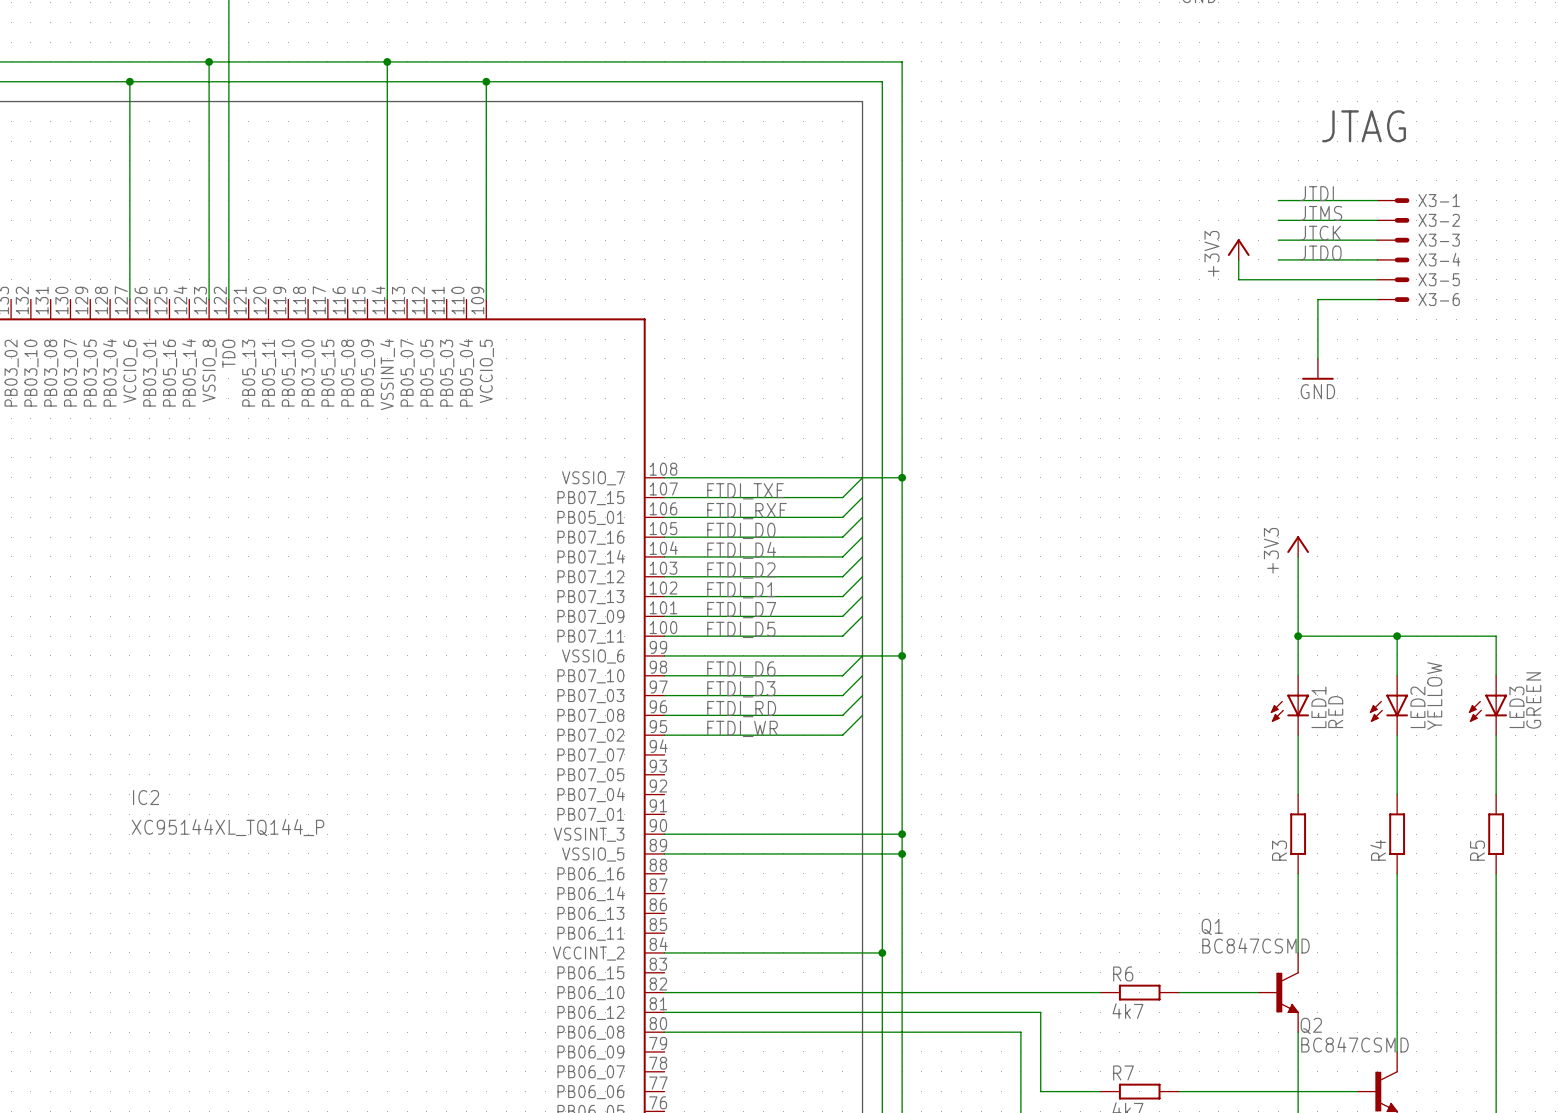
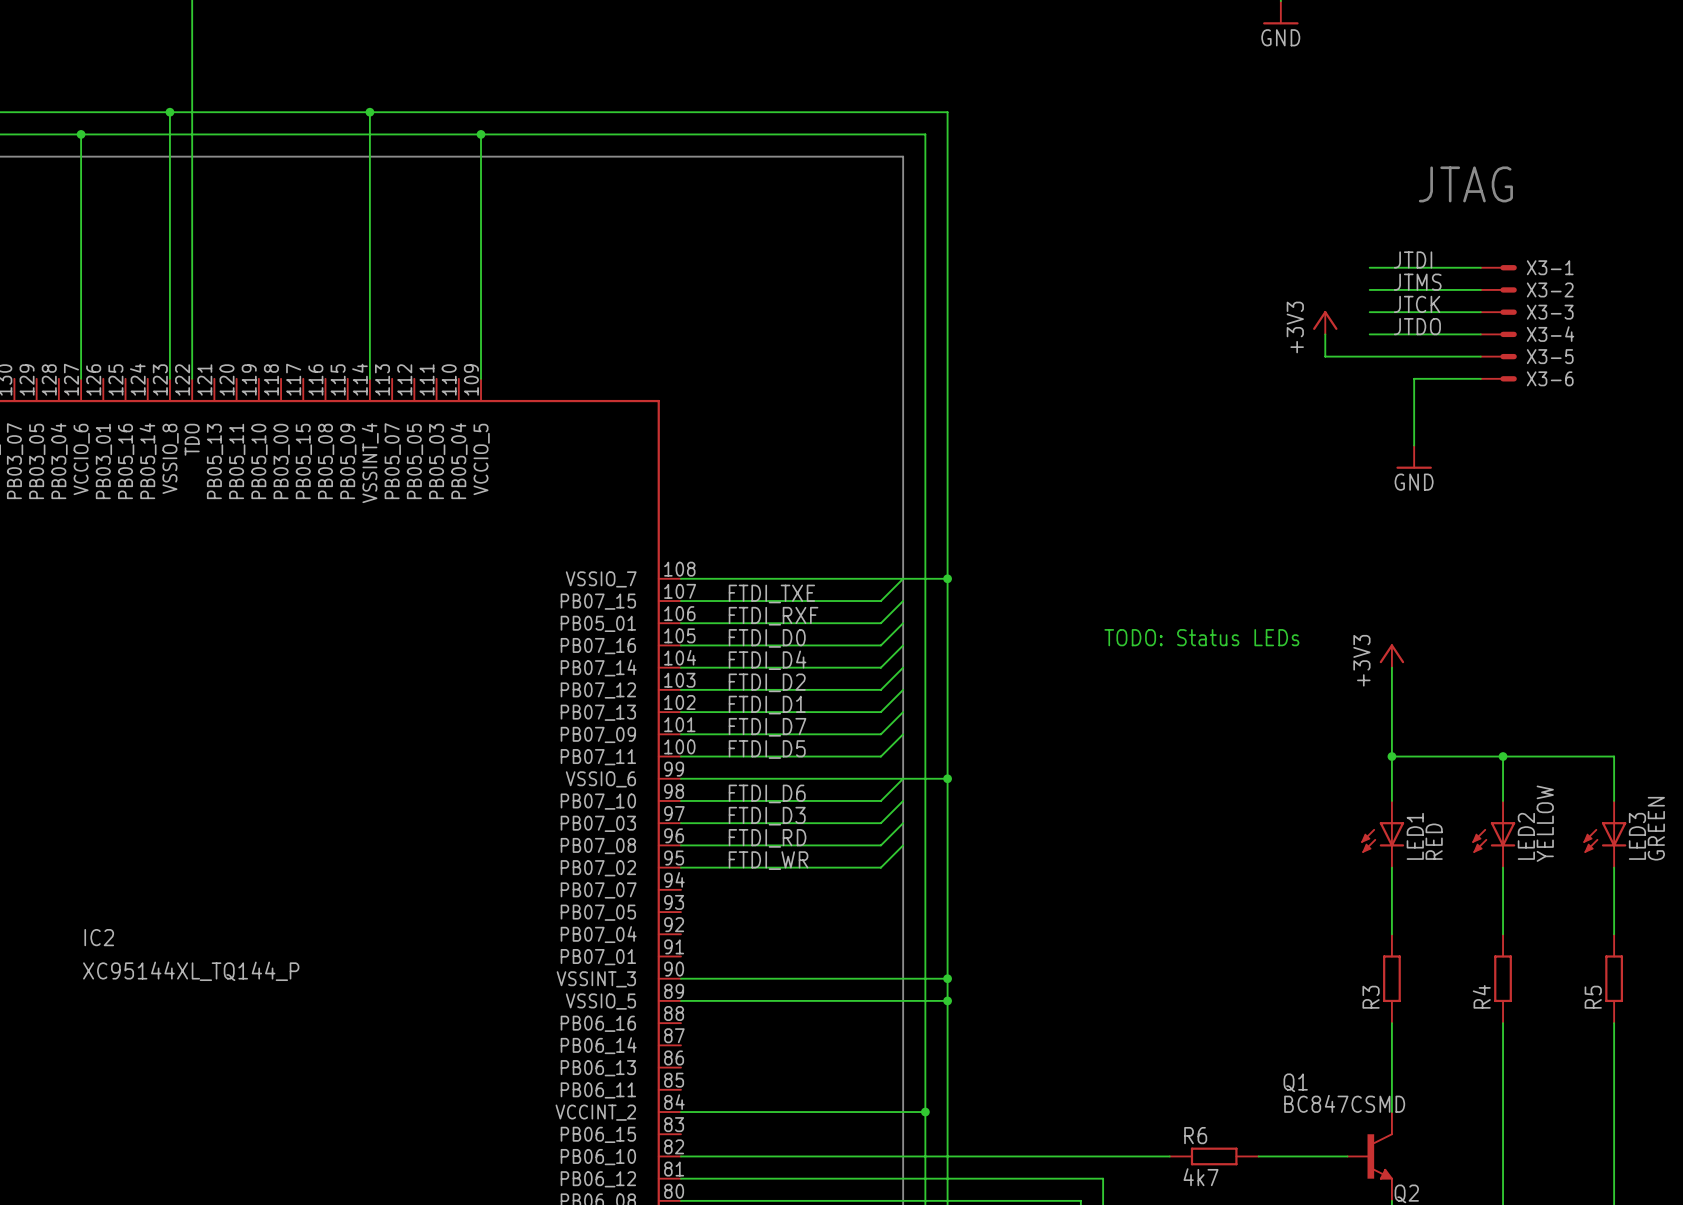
text: none -> TODO: Status LEDs (1201, 637)

